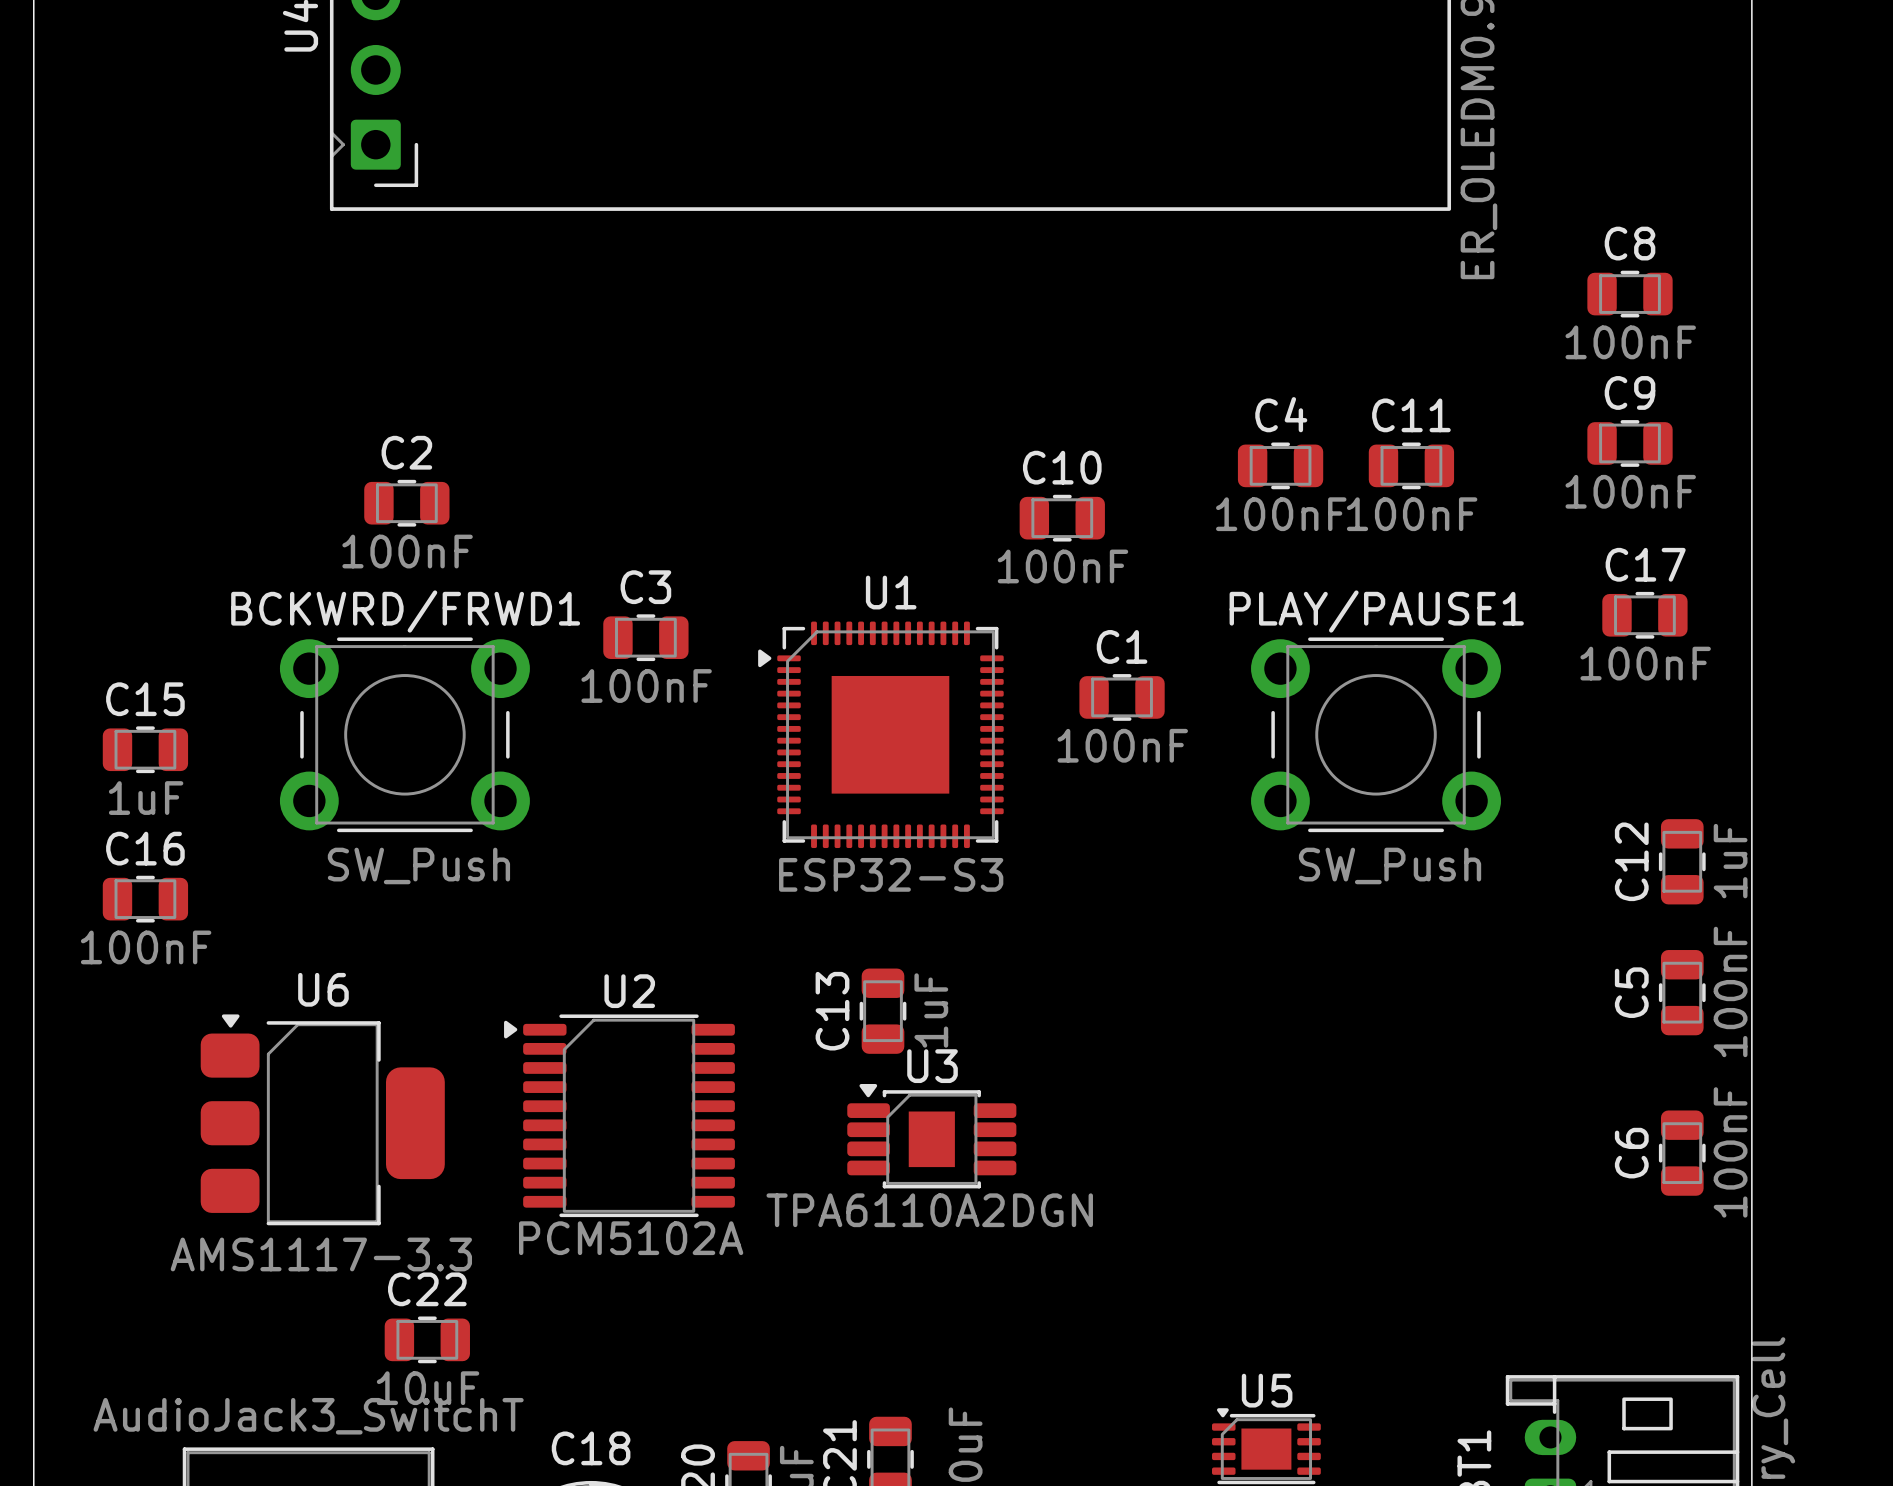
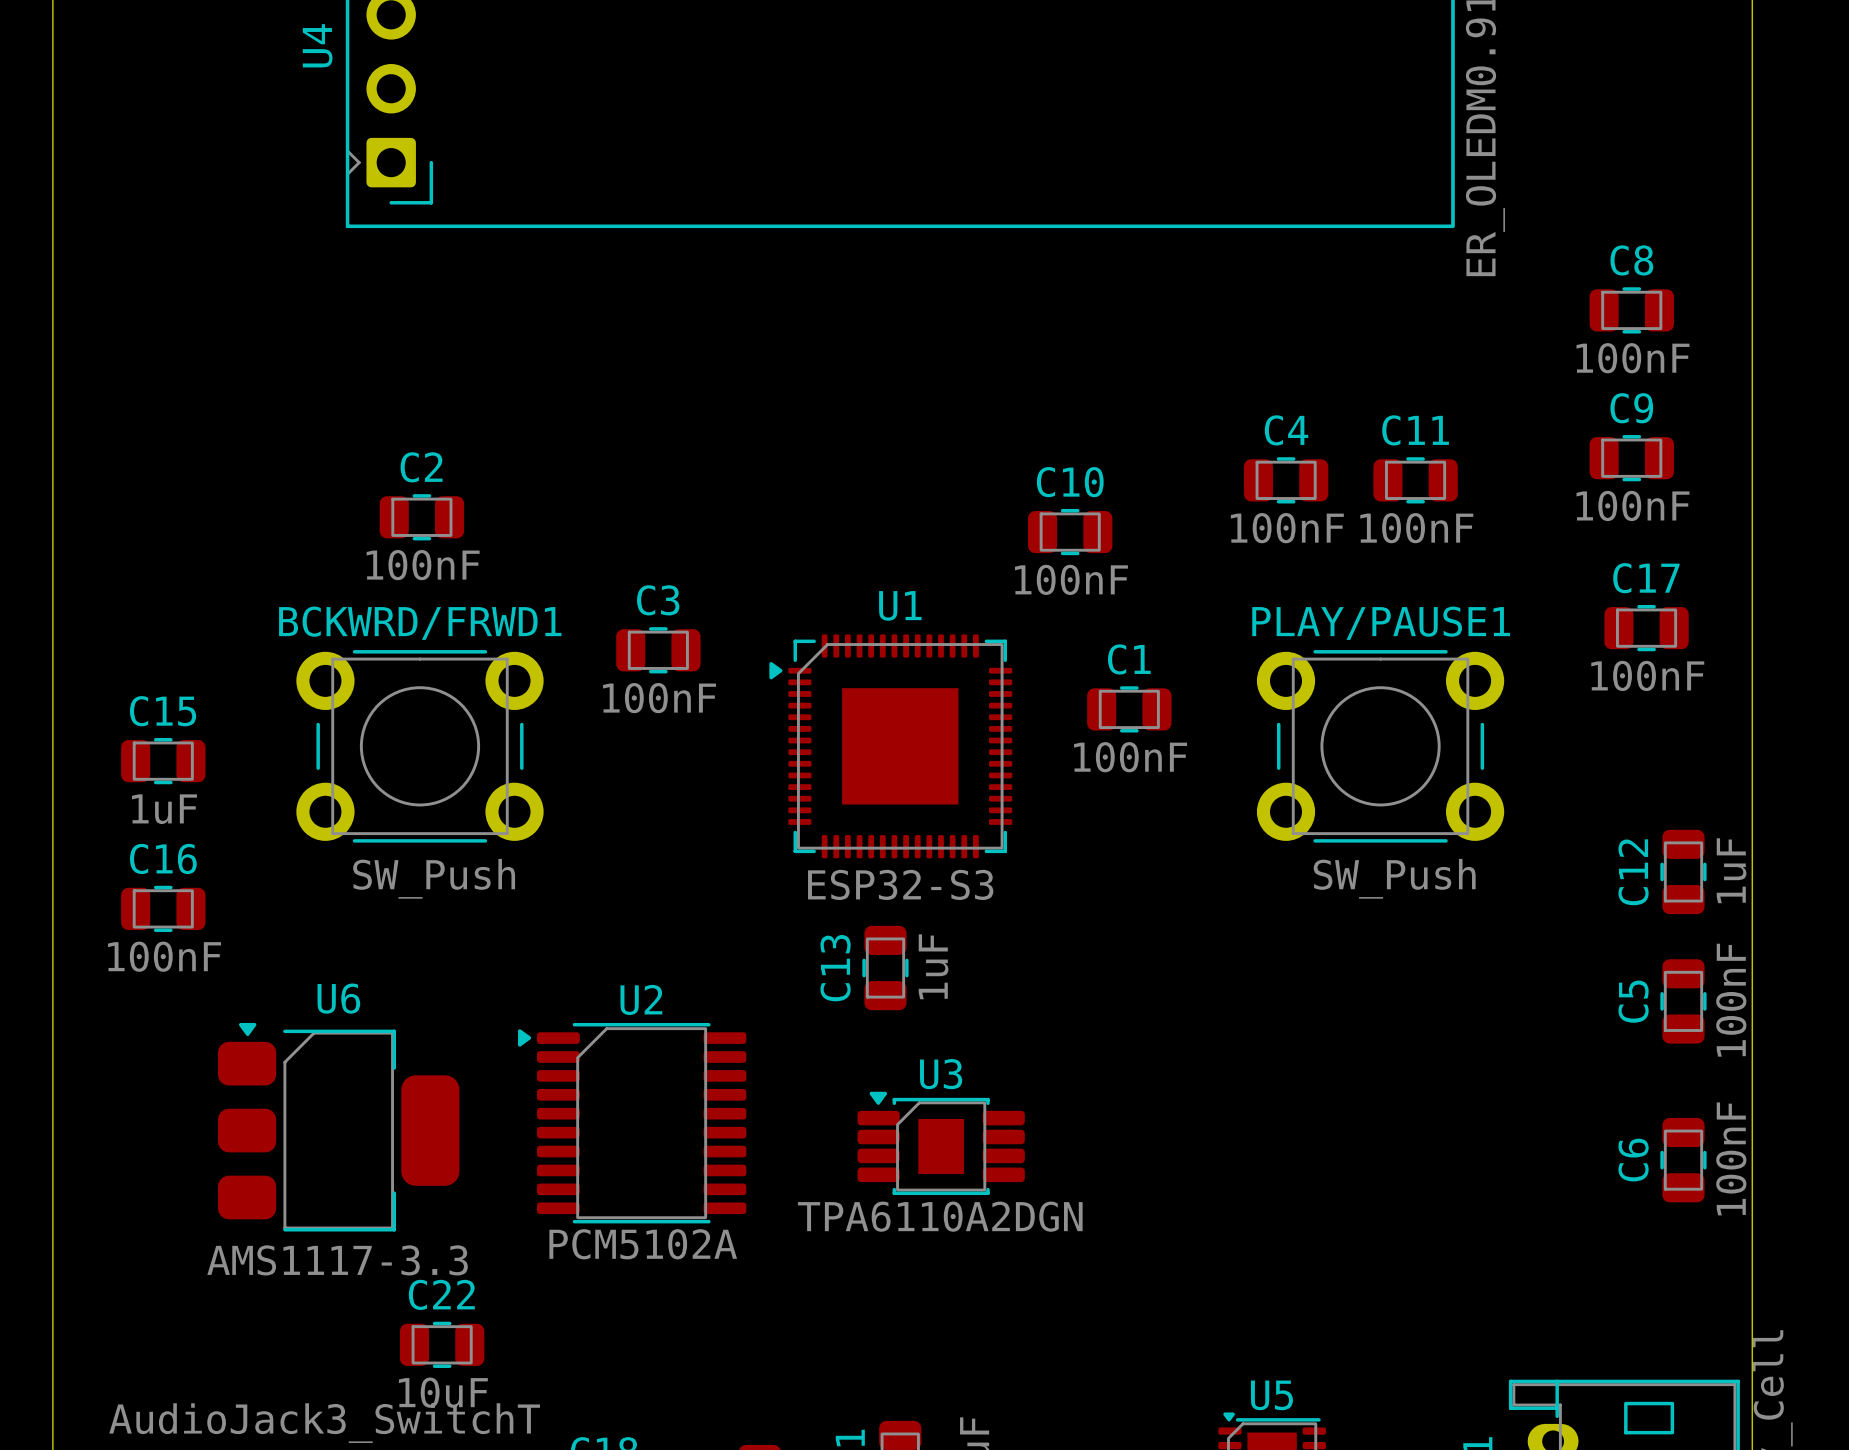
C13 position: (883, 1011) -> (885, 968)

